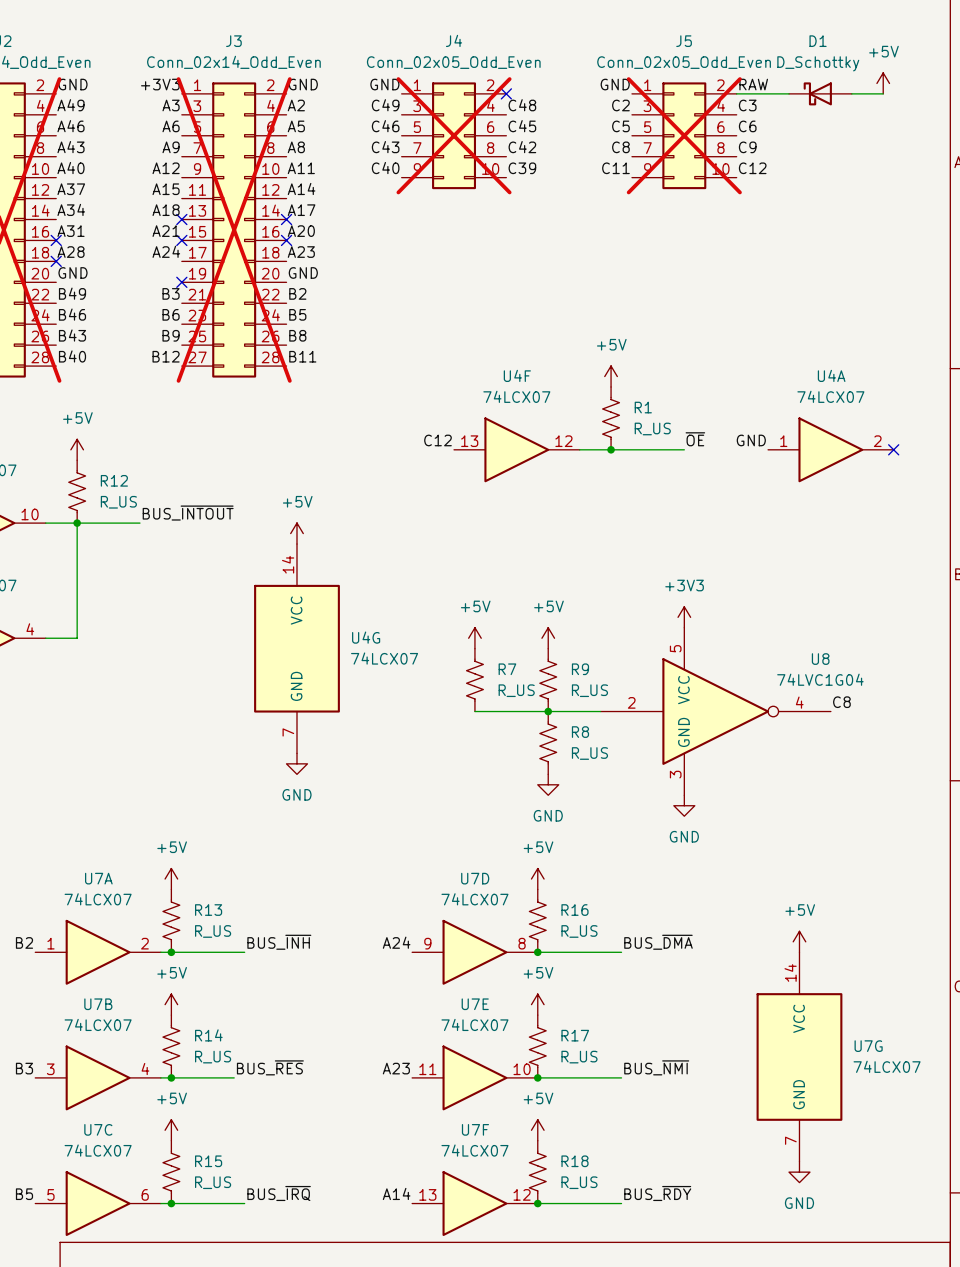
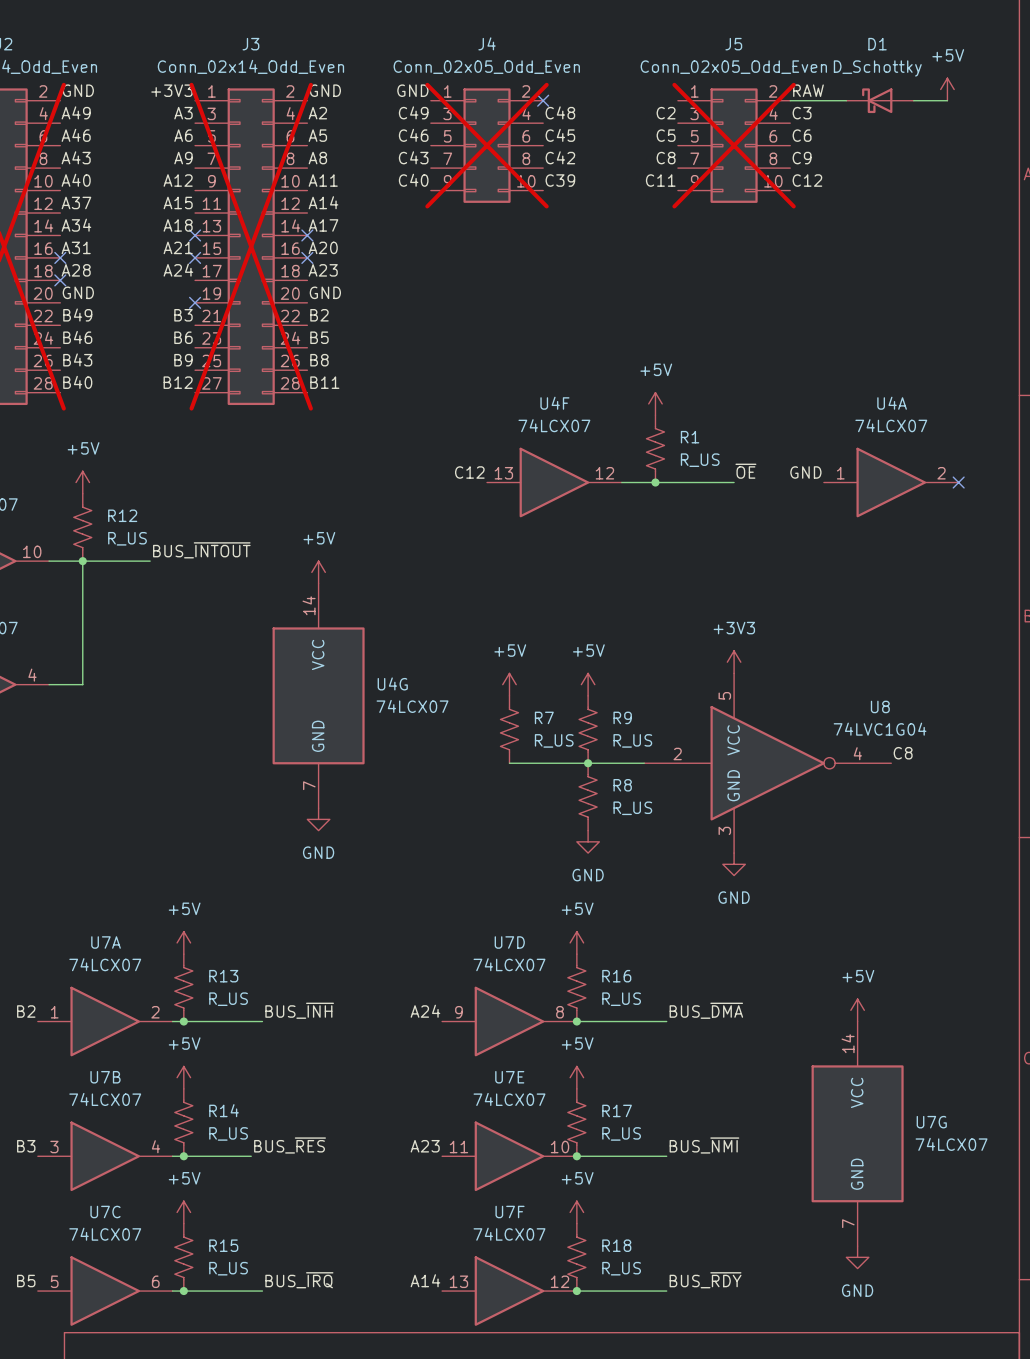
label: GND (615, 84) -> none

